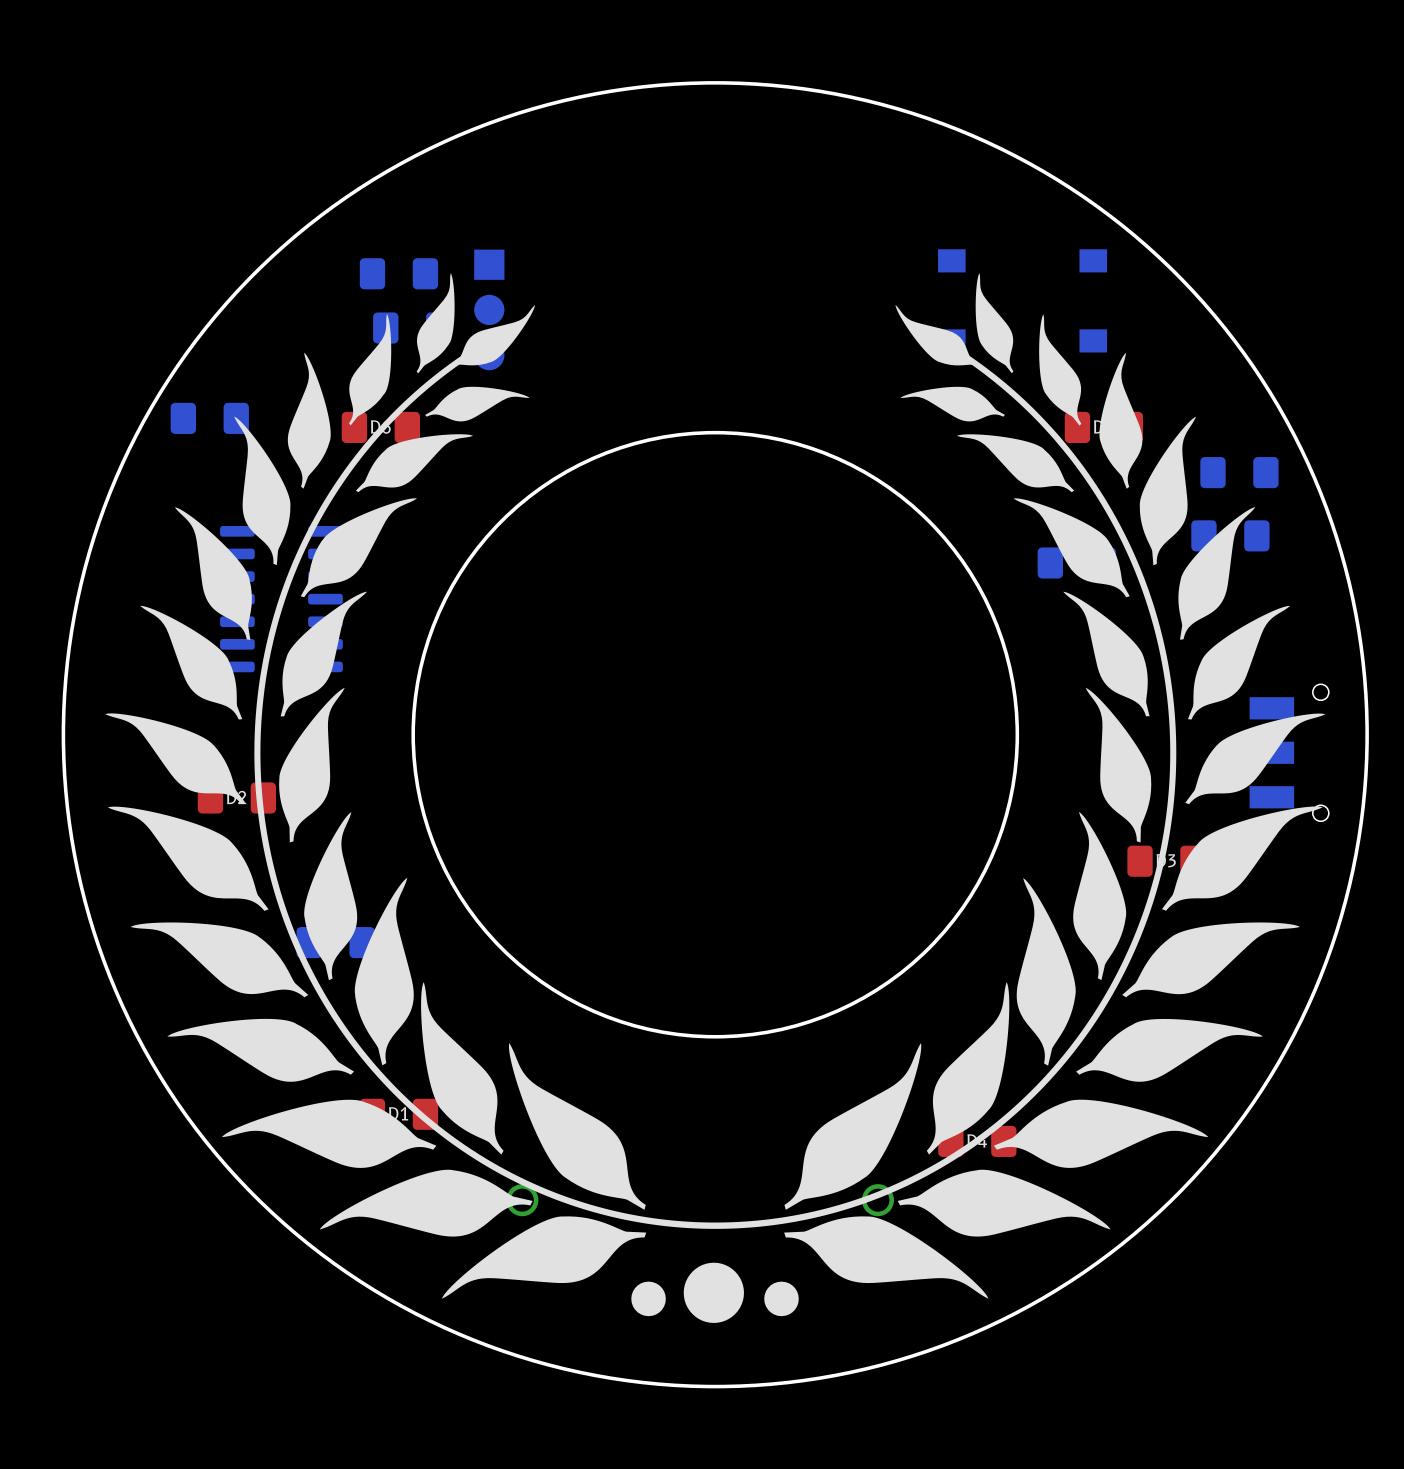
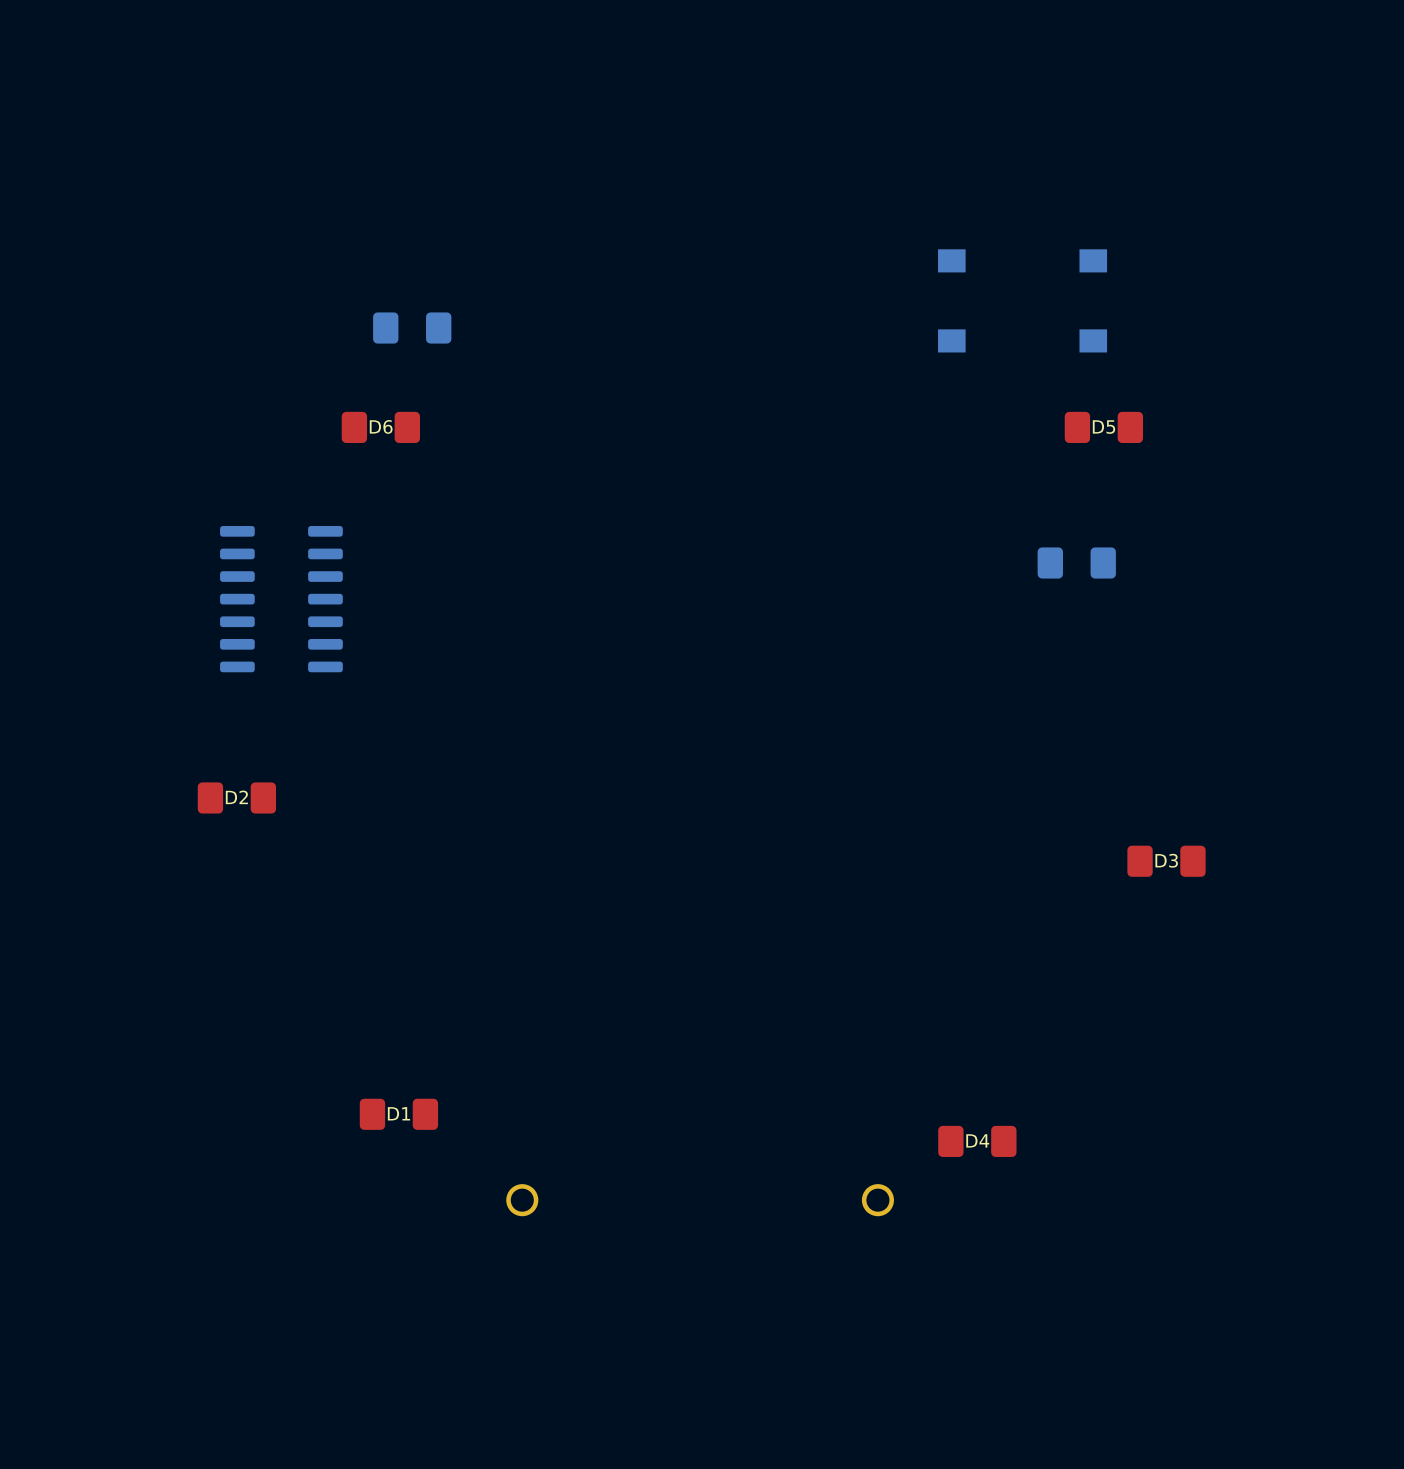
round board edge: [61, 81, 1369, 1389] -> none
drawing: [105, 272, 1326, 1323] -> none
part: (398, 273) -> none
part: (489, 309) -> none
part: (209, 418) -> none
round board edge: [411, 430, 1020, 1039] -> none
part: (1239, 472) -> none
part: (1230, 535) -> none
part: (1289, 752) -> none
part: (335, 942) -> none

